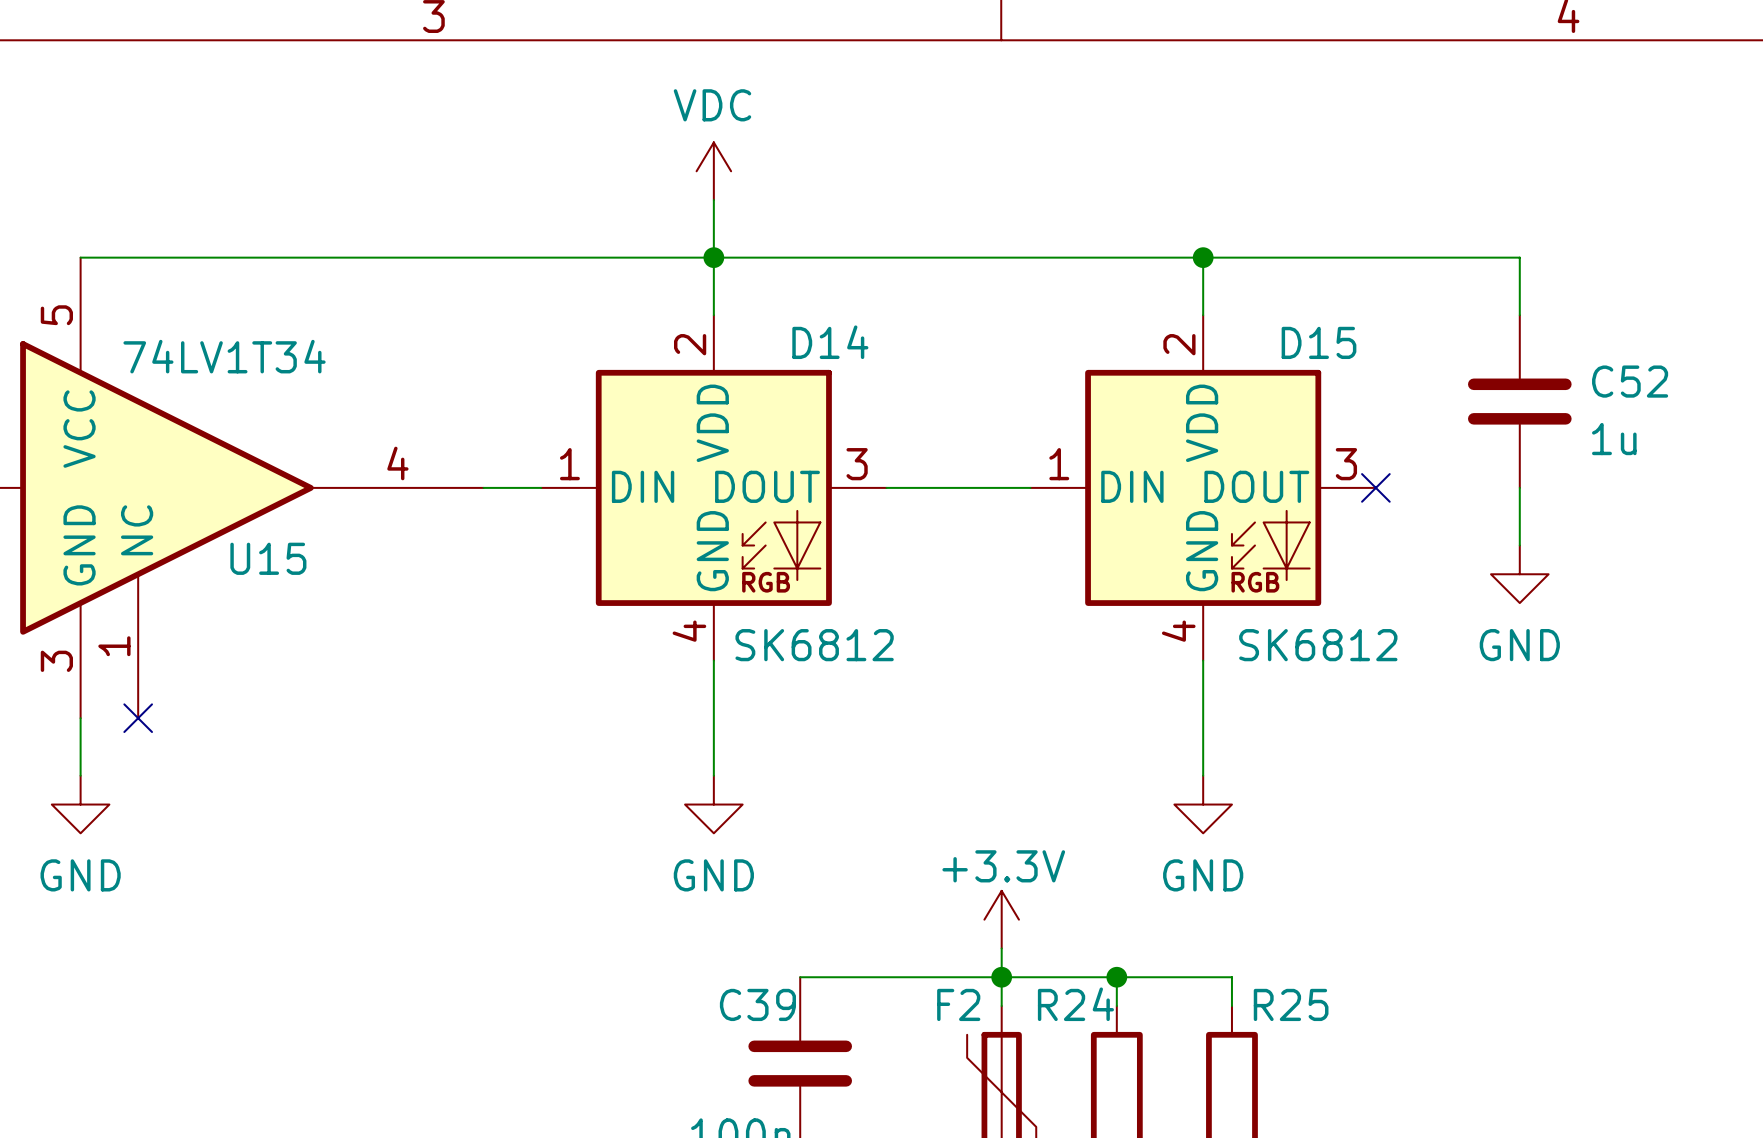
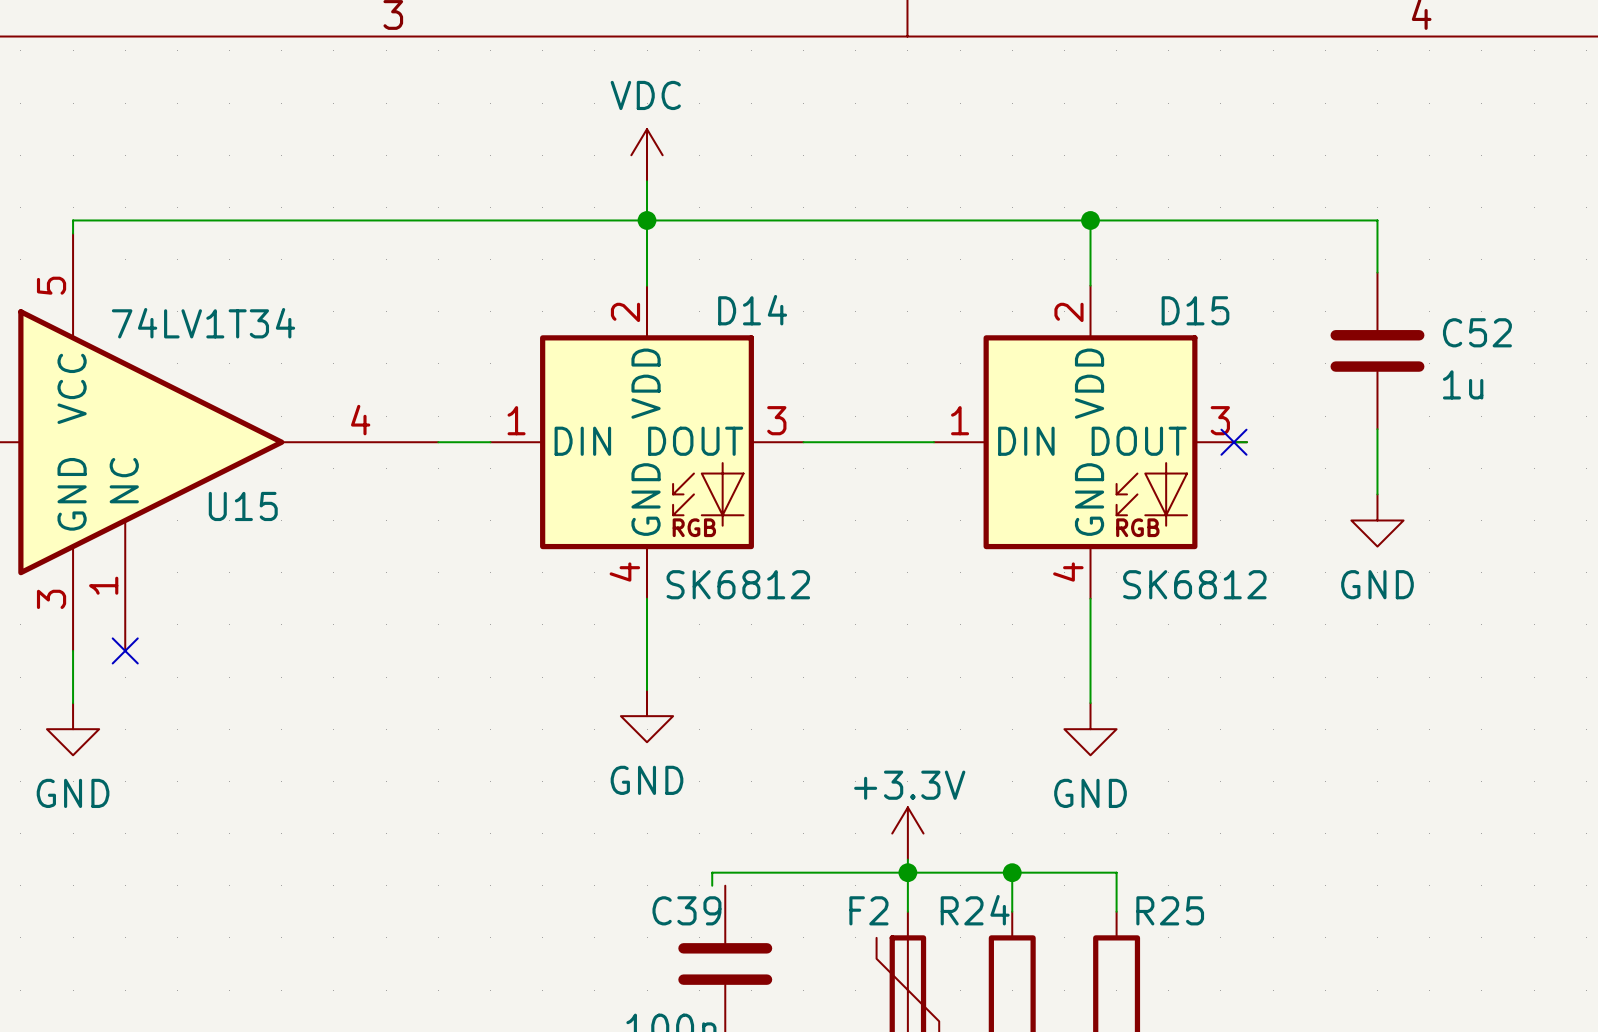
wire: (80, 257) (1519, 257) -> (73, 233) (73, 220) (1377, 220) (1377, 233)
junction position: (713, 257) -> (647, 220)
junction position: (1203, 257) -> (1090, 220)
C52 position: (1519, 401) -> (1377, 350)
no-connect mark position: (1375, 487) -> (1233, 442)
power symbol position: GND (713, 804) -> GND (647, 716)
wire: (800, 977) (1231, 977) -> (712, 885) (712, 872) (1116, 872) (1116, 885)
junction position: (1001, 977) -> (907, 872)
junction position: (1116, 977) -> (1012, 872)

